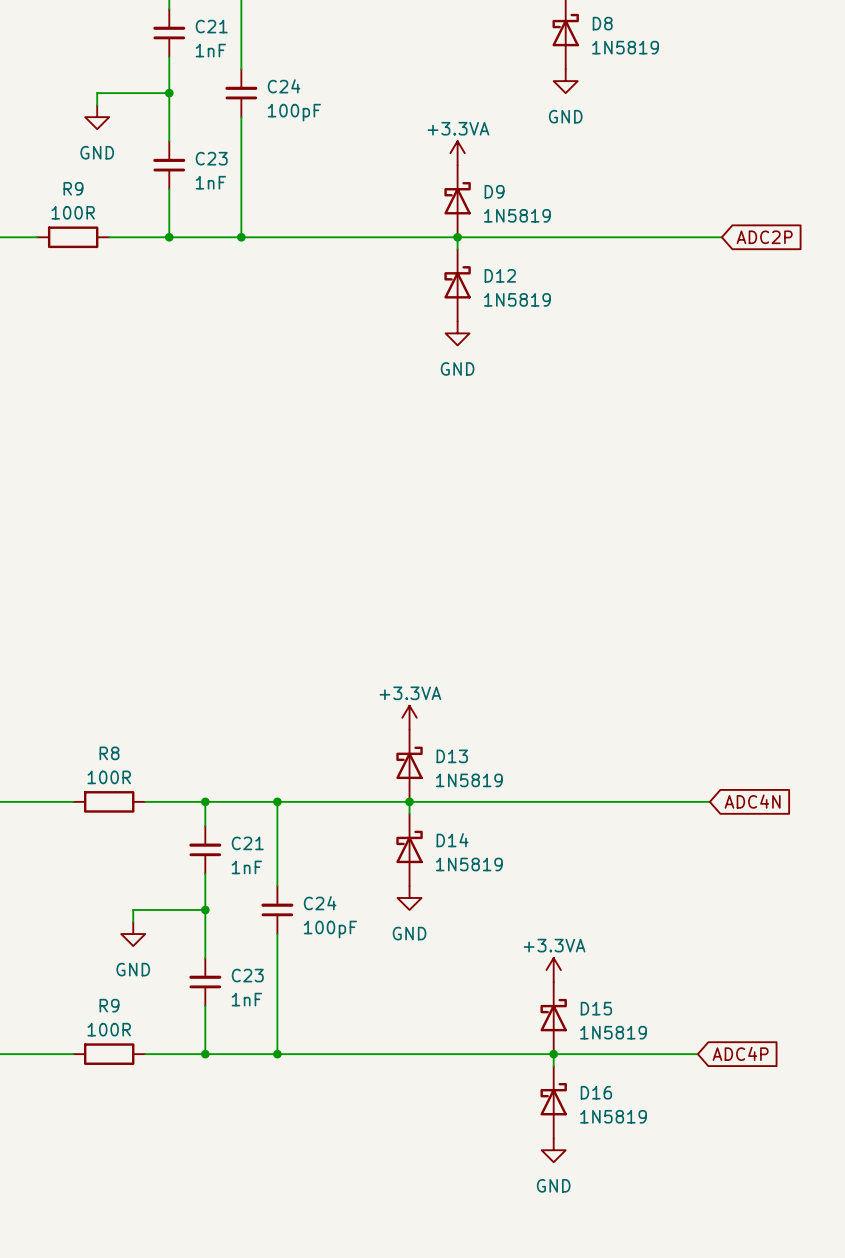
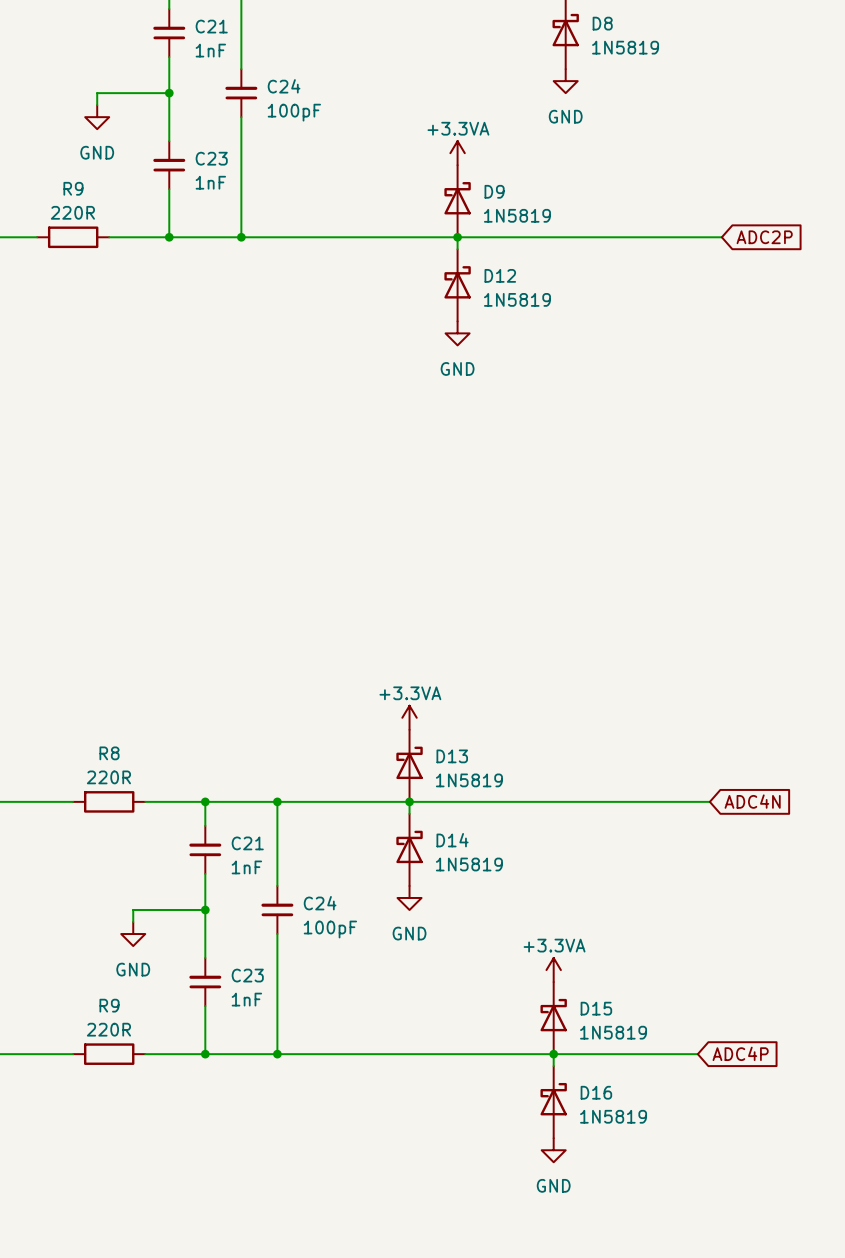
R9 value: 100R (73, 212) -> 220R (72, 212)
R8 value: 100R (109, 777) -> 220R (108, 777)
R9 value: 100R (109, 1029) -> 220R (108, 1029)

